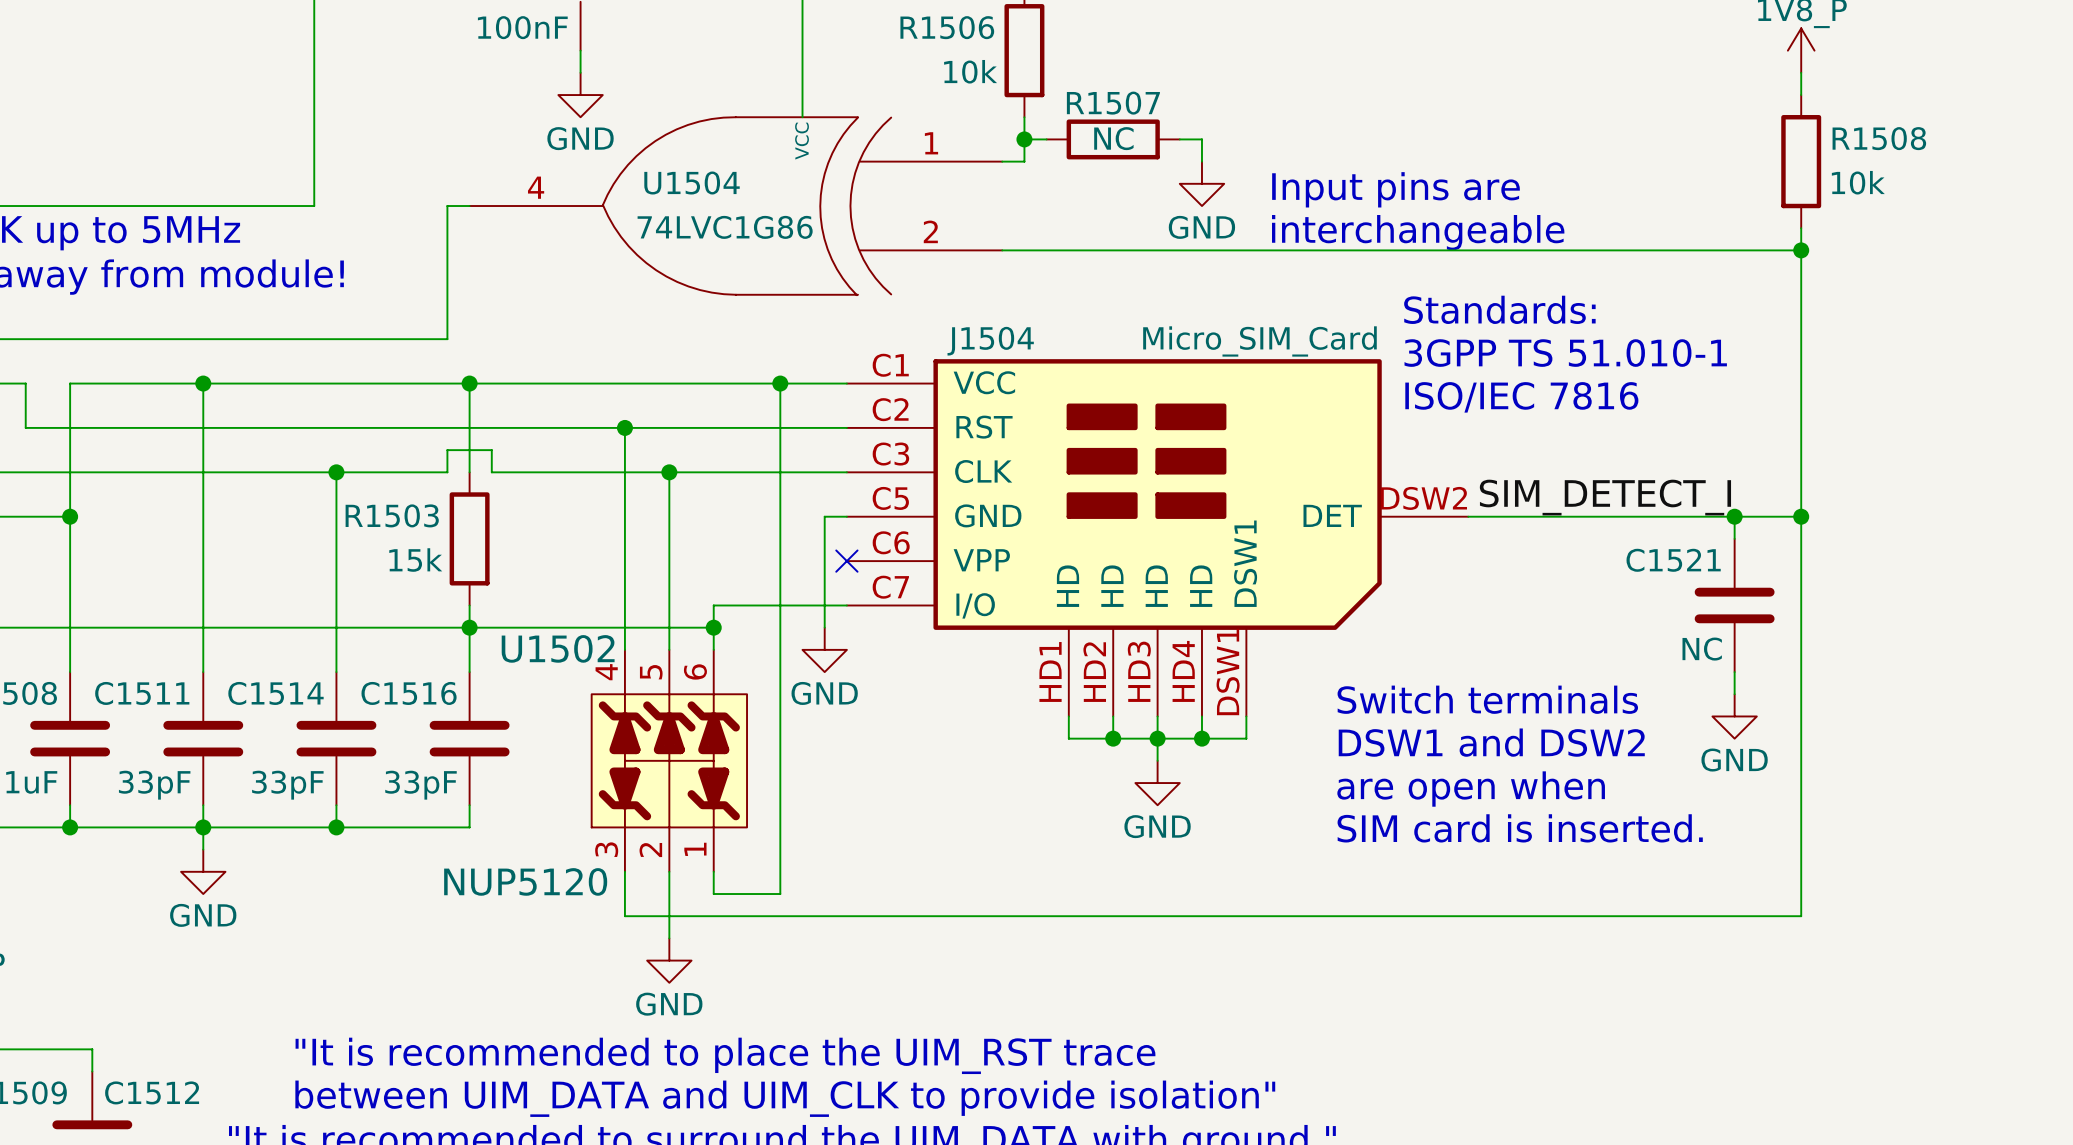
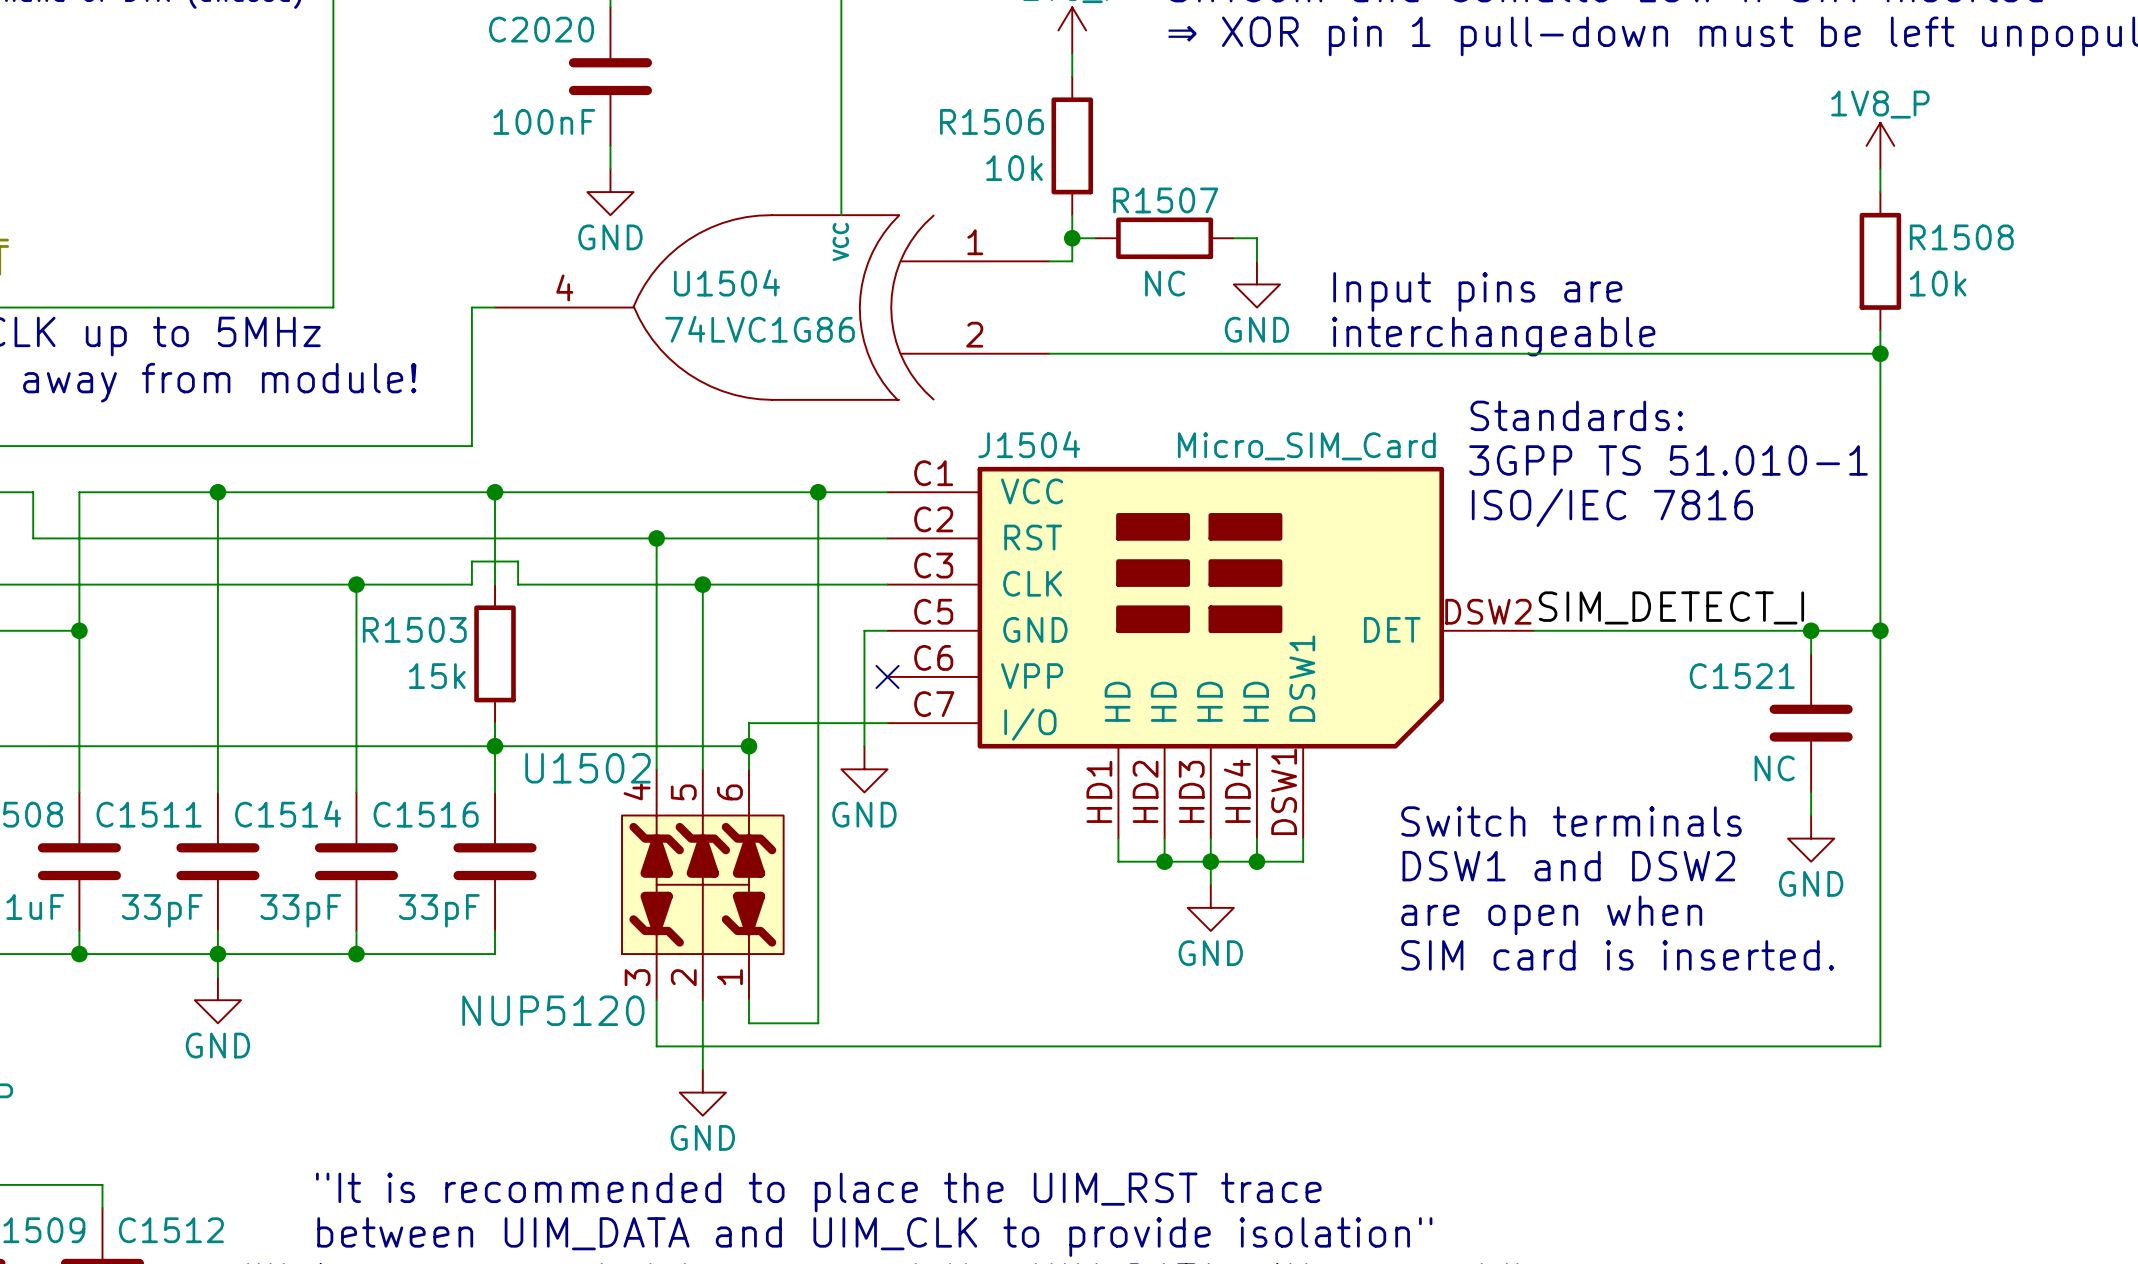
R1507 value position: NC (1113, 138) -> NC (1165, 283)

